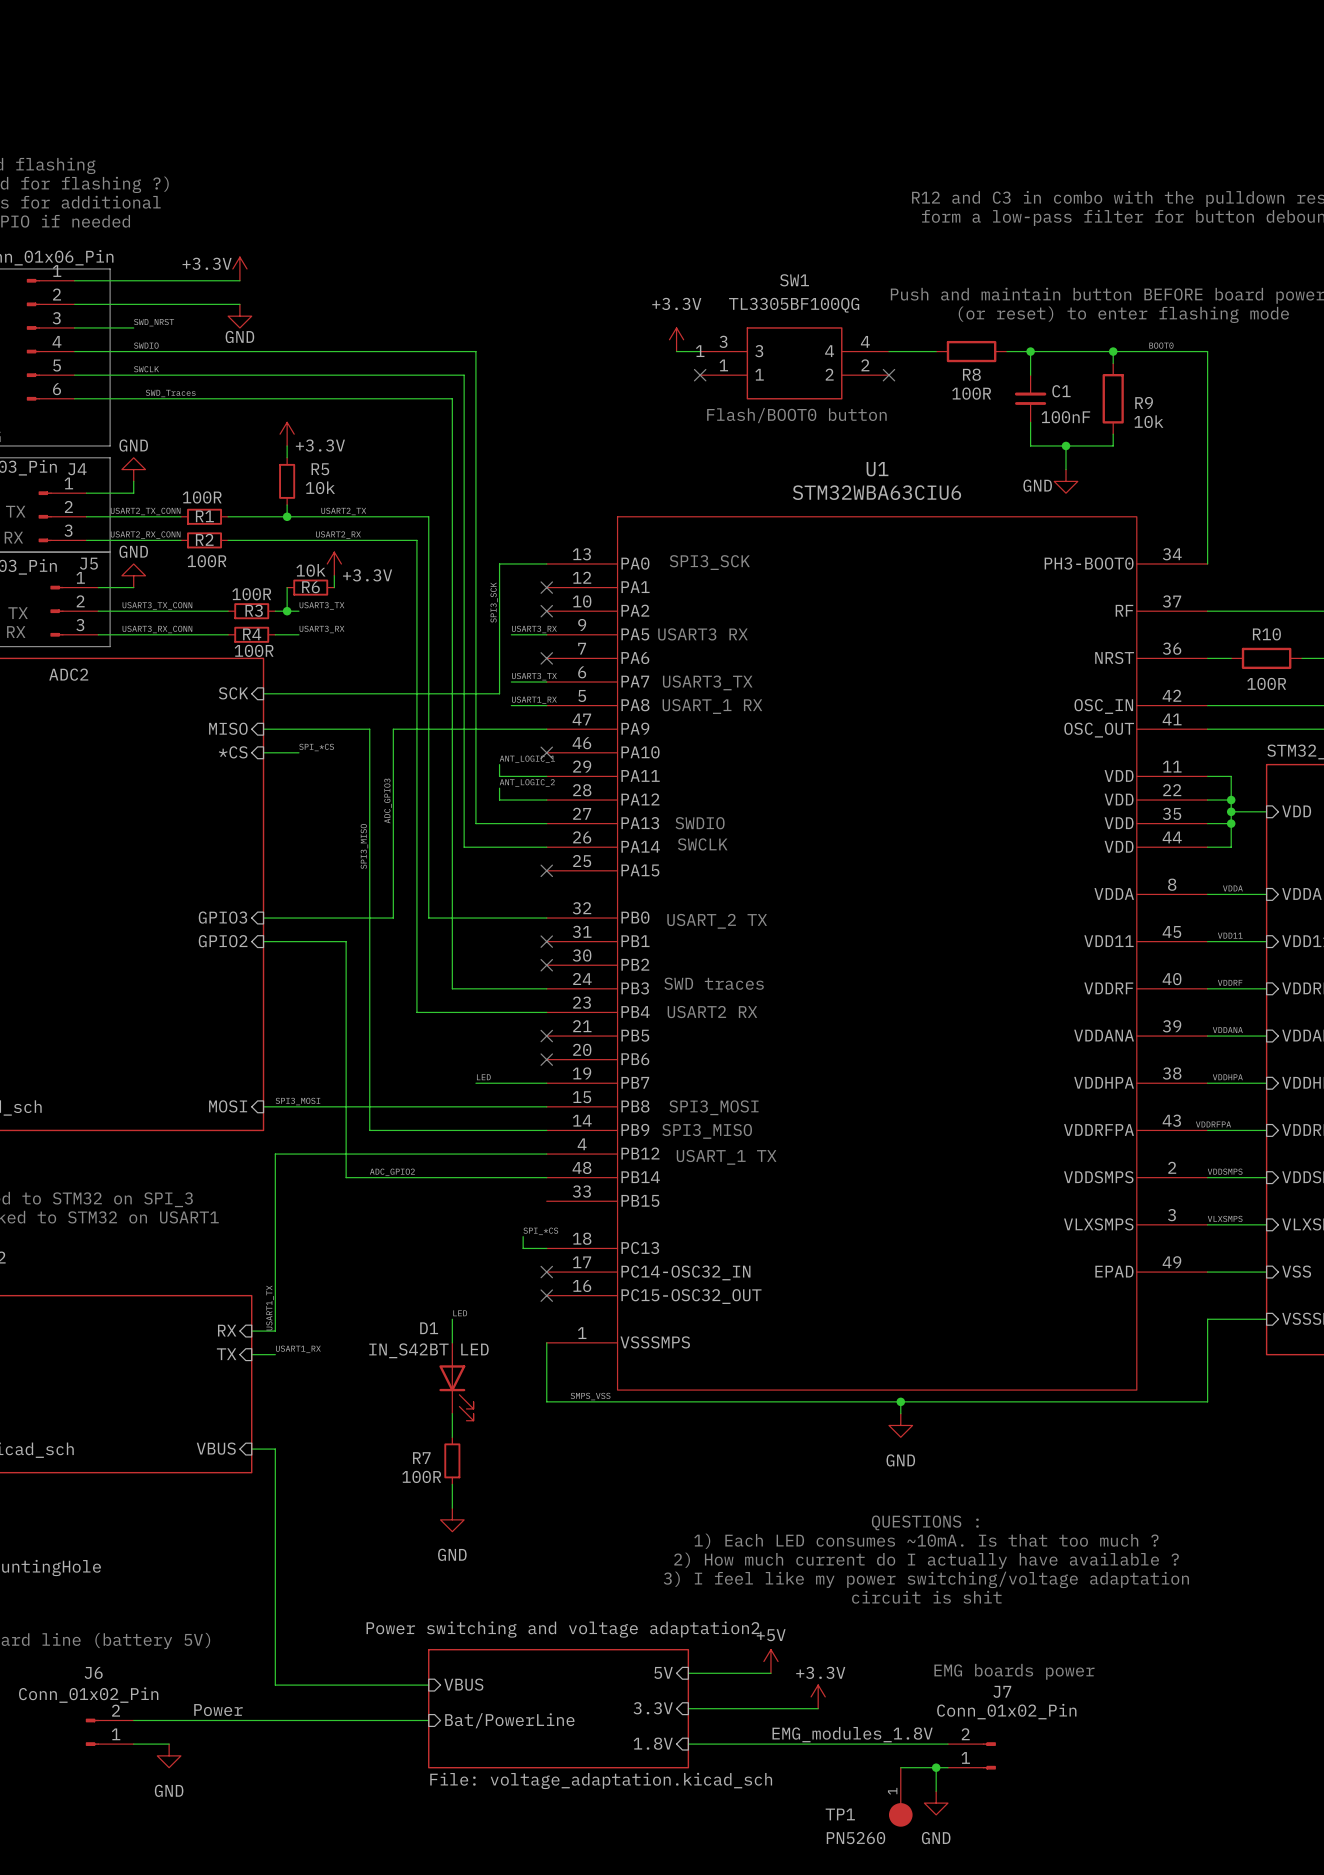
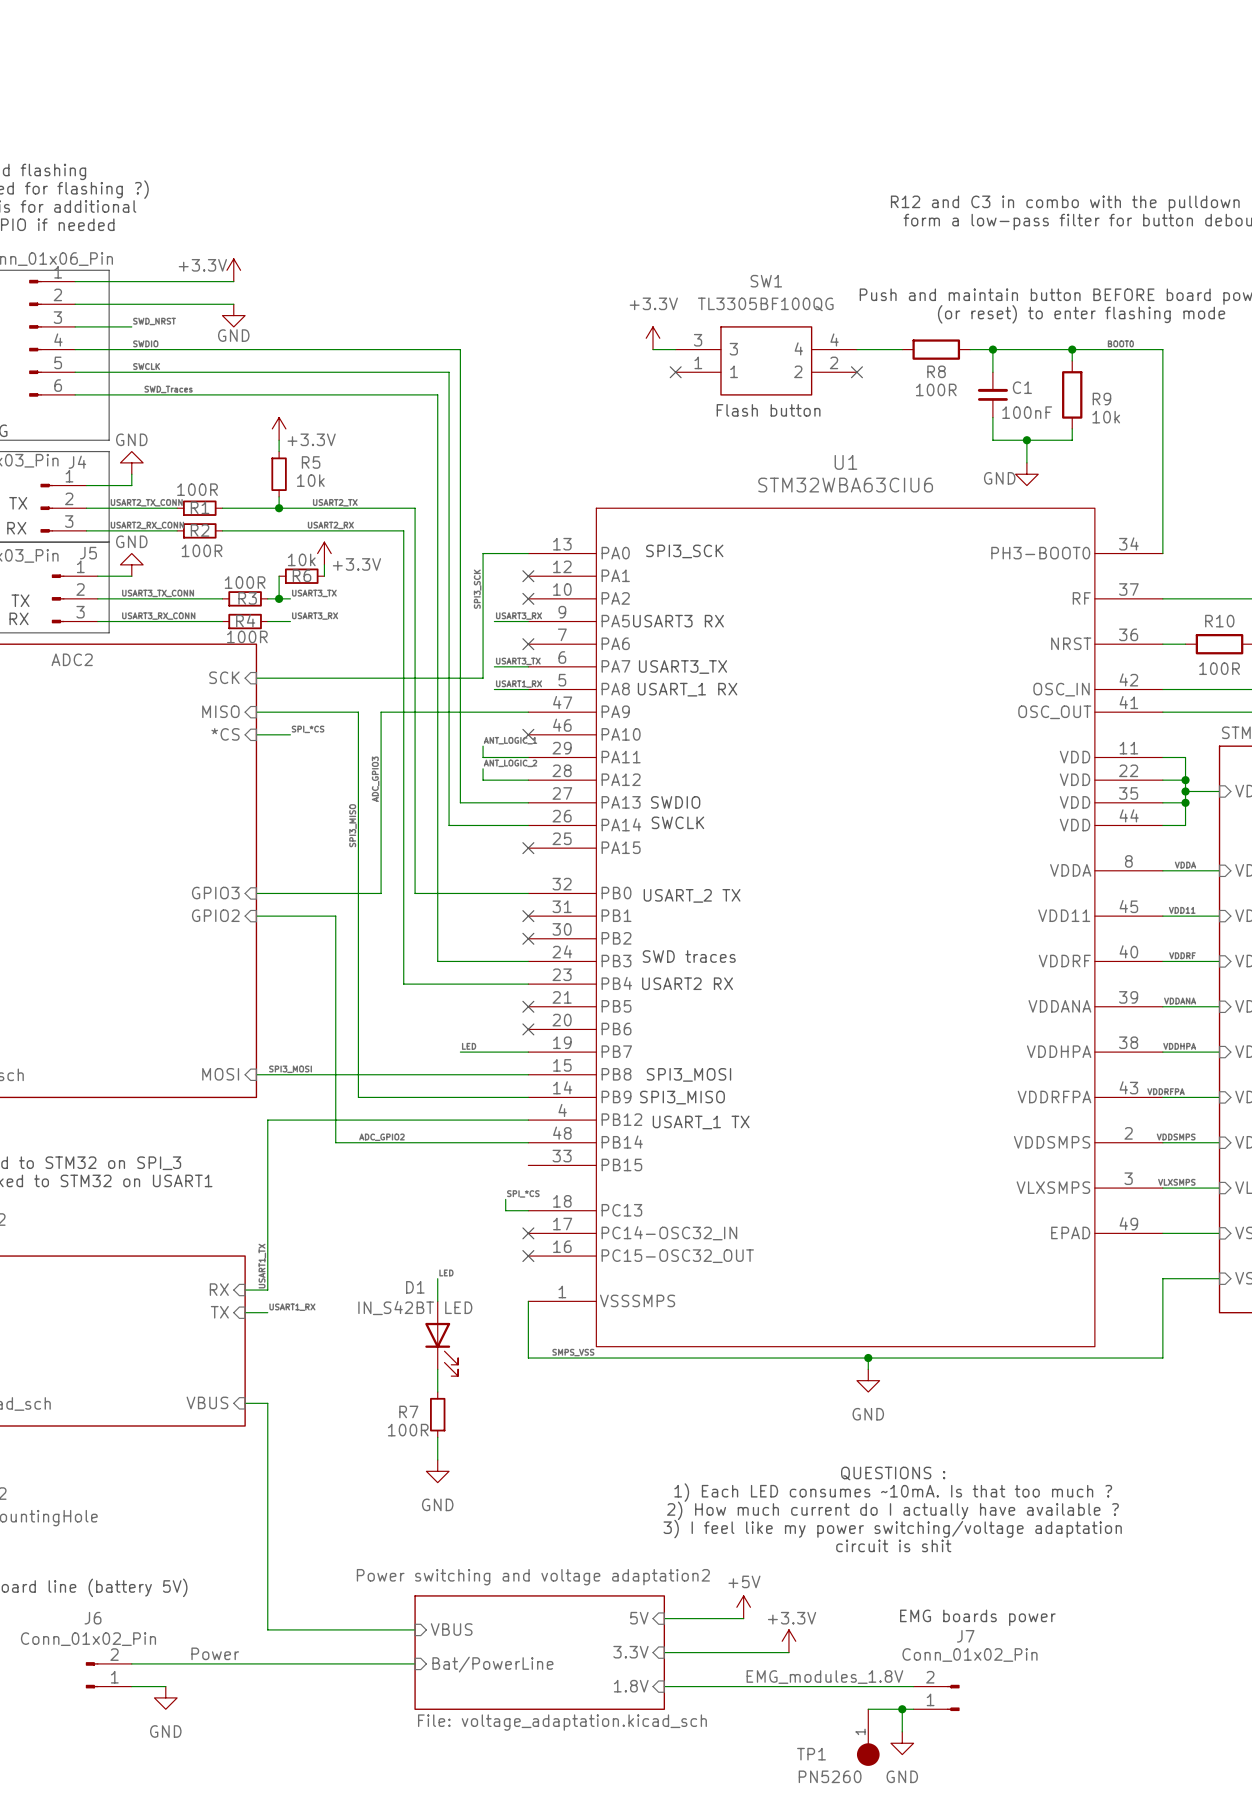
SW1 text: 1 (700, 351) -> none
text: Flash/BOOT0 button (796, 415) -> Flash button (768, 410)

